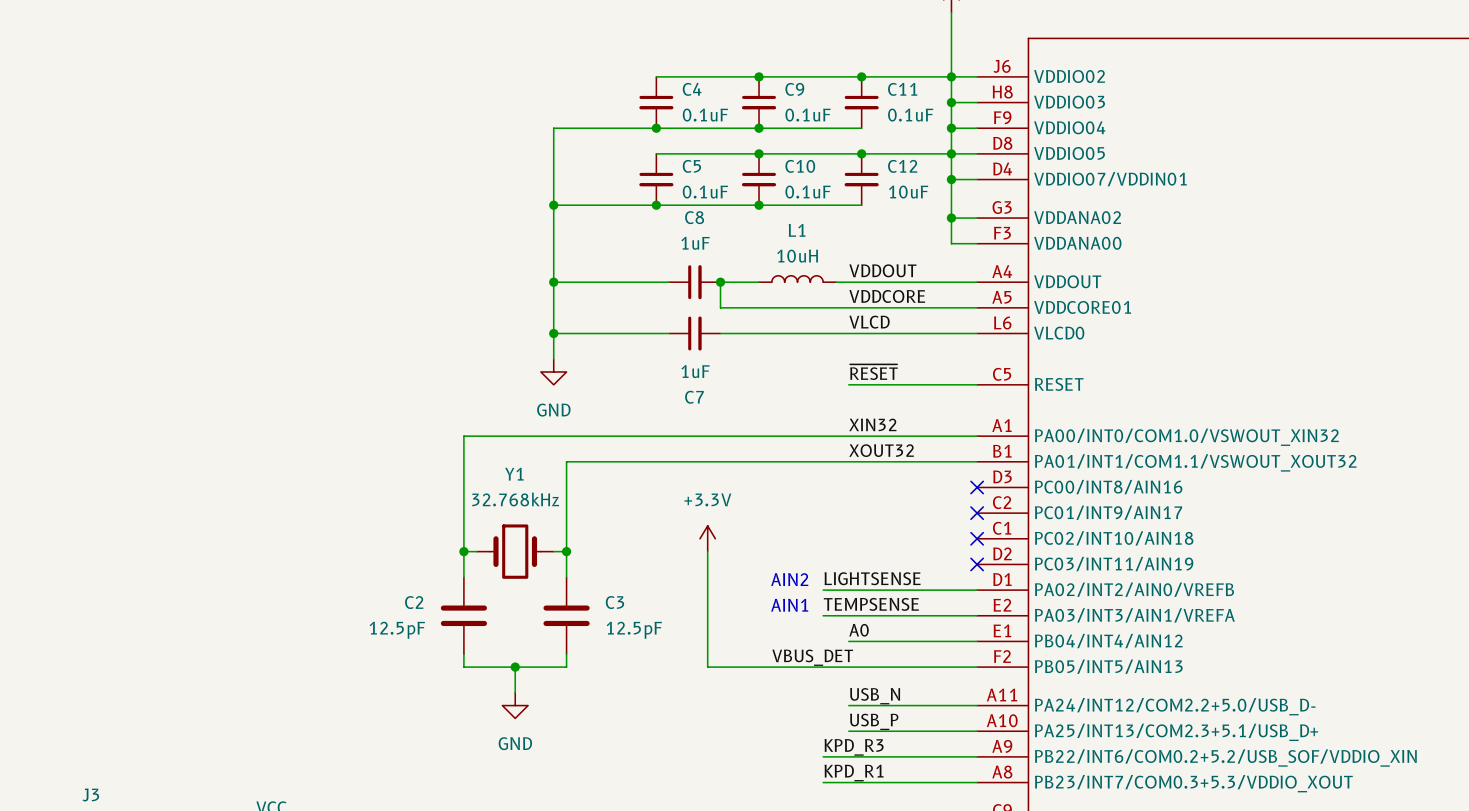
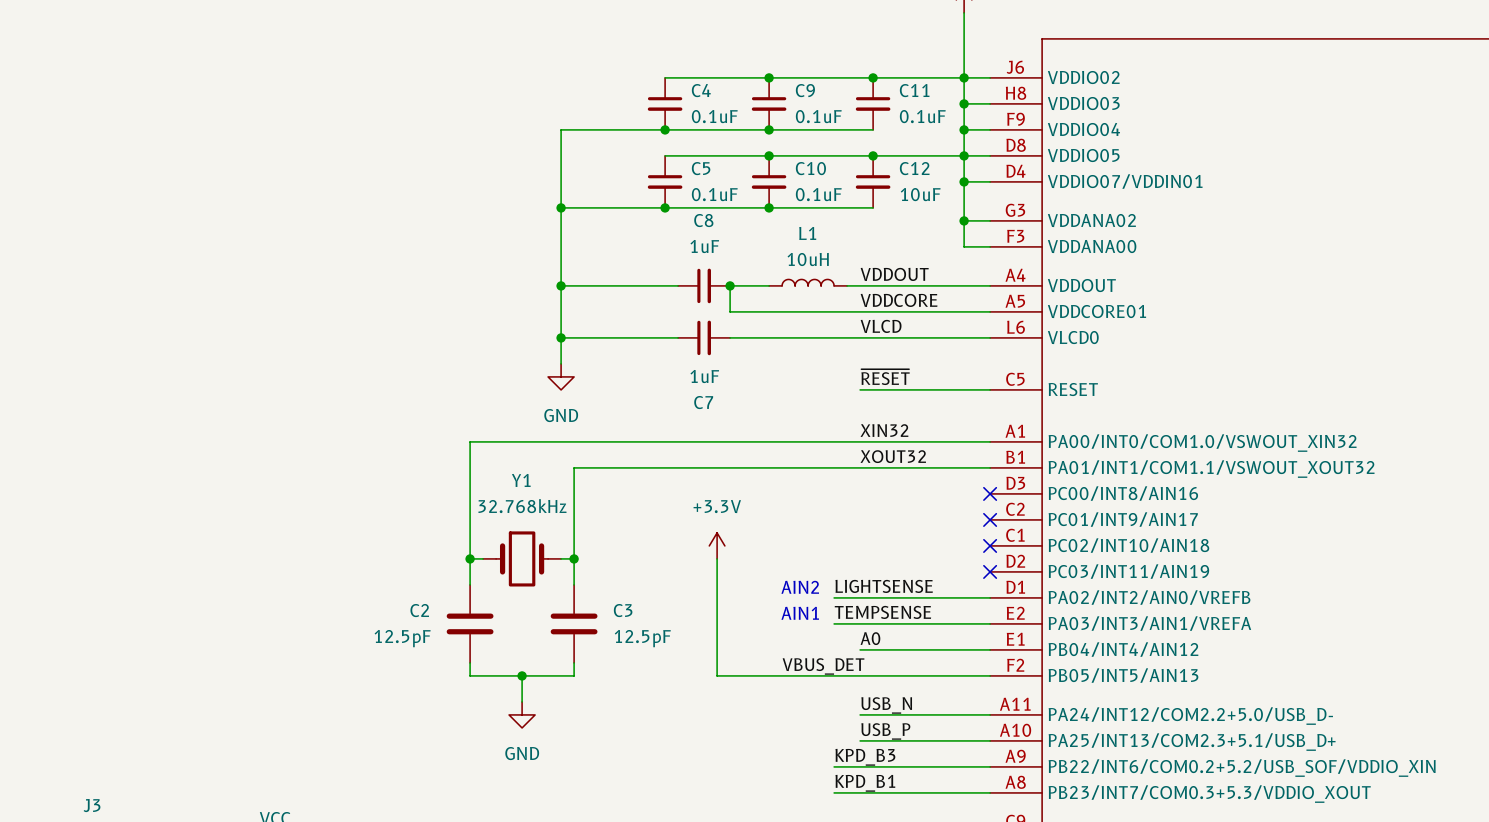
label: KPD_R3 (854, 747) -> KPD_B3 (865, 757)
label: KPD_R1 (854, 773) -> KPD_B1 (865, 783)

